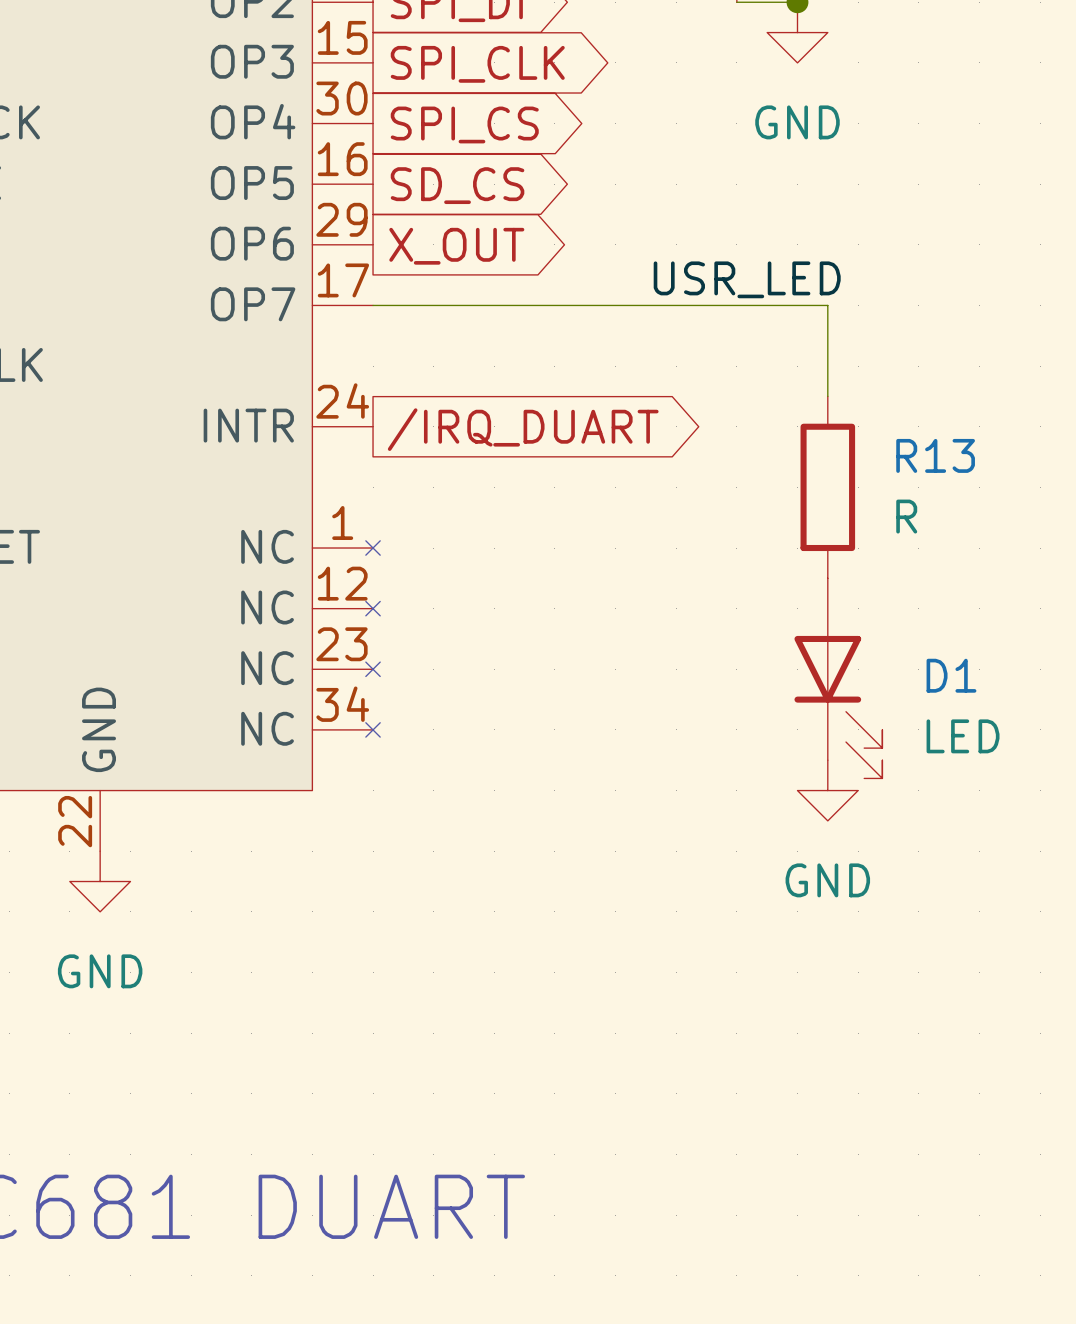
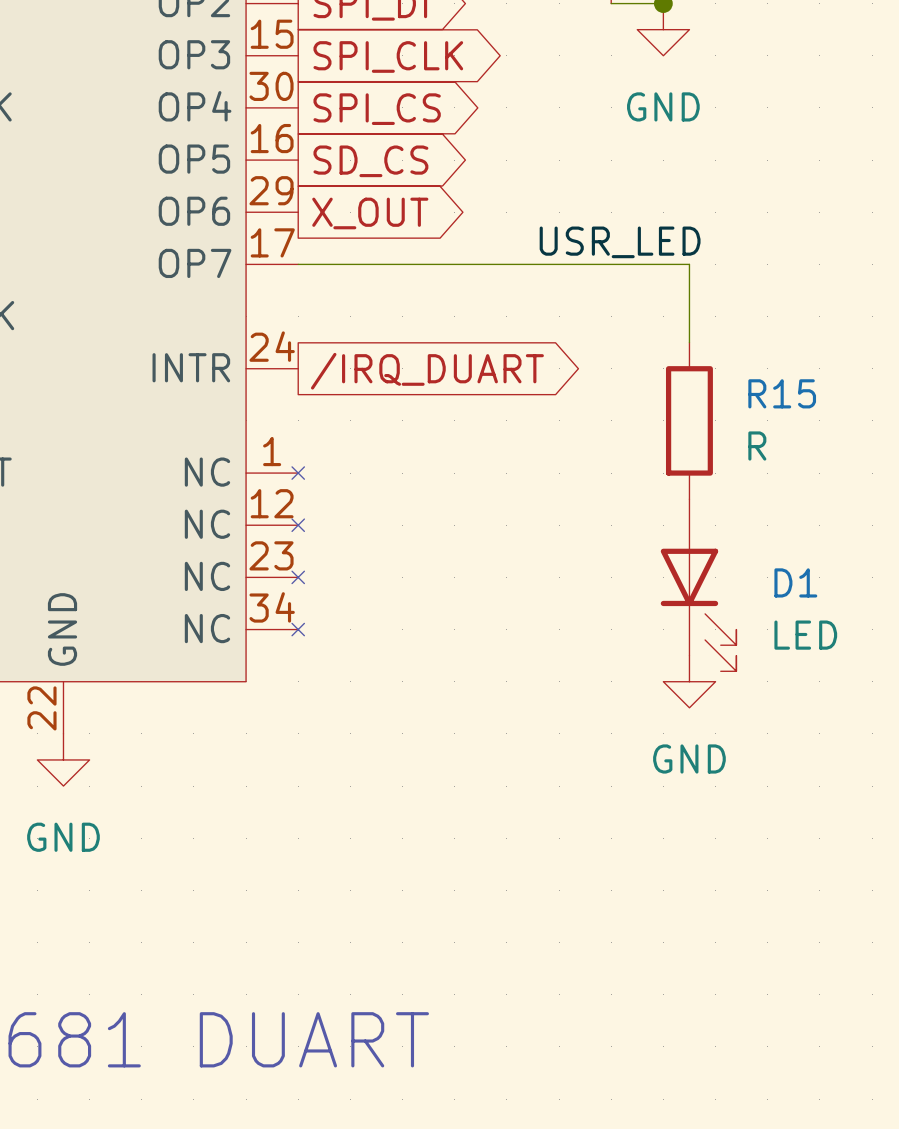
R13 name: R13 (935, 455) -> R15 (782, 393)

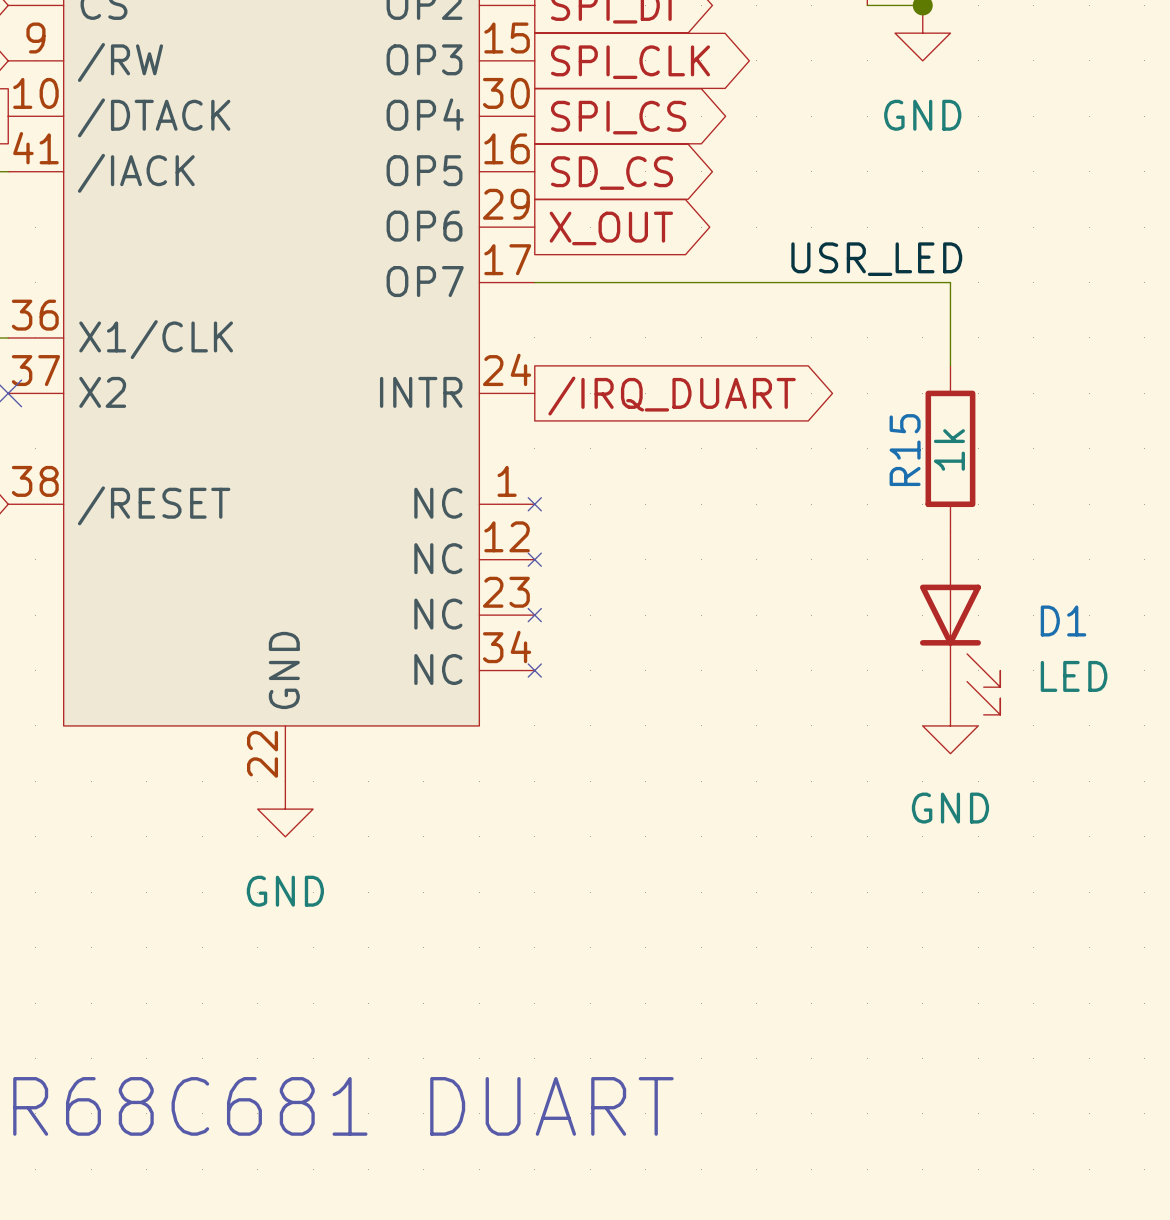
R15 name rotation: 0° (782, 393) -> 90° counterclockwise (905, 450)
R15 name position: R15 (782, 393) -> R15 (905, 450)
R15 value: R (757, 446) -> 1k (949, 449)

